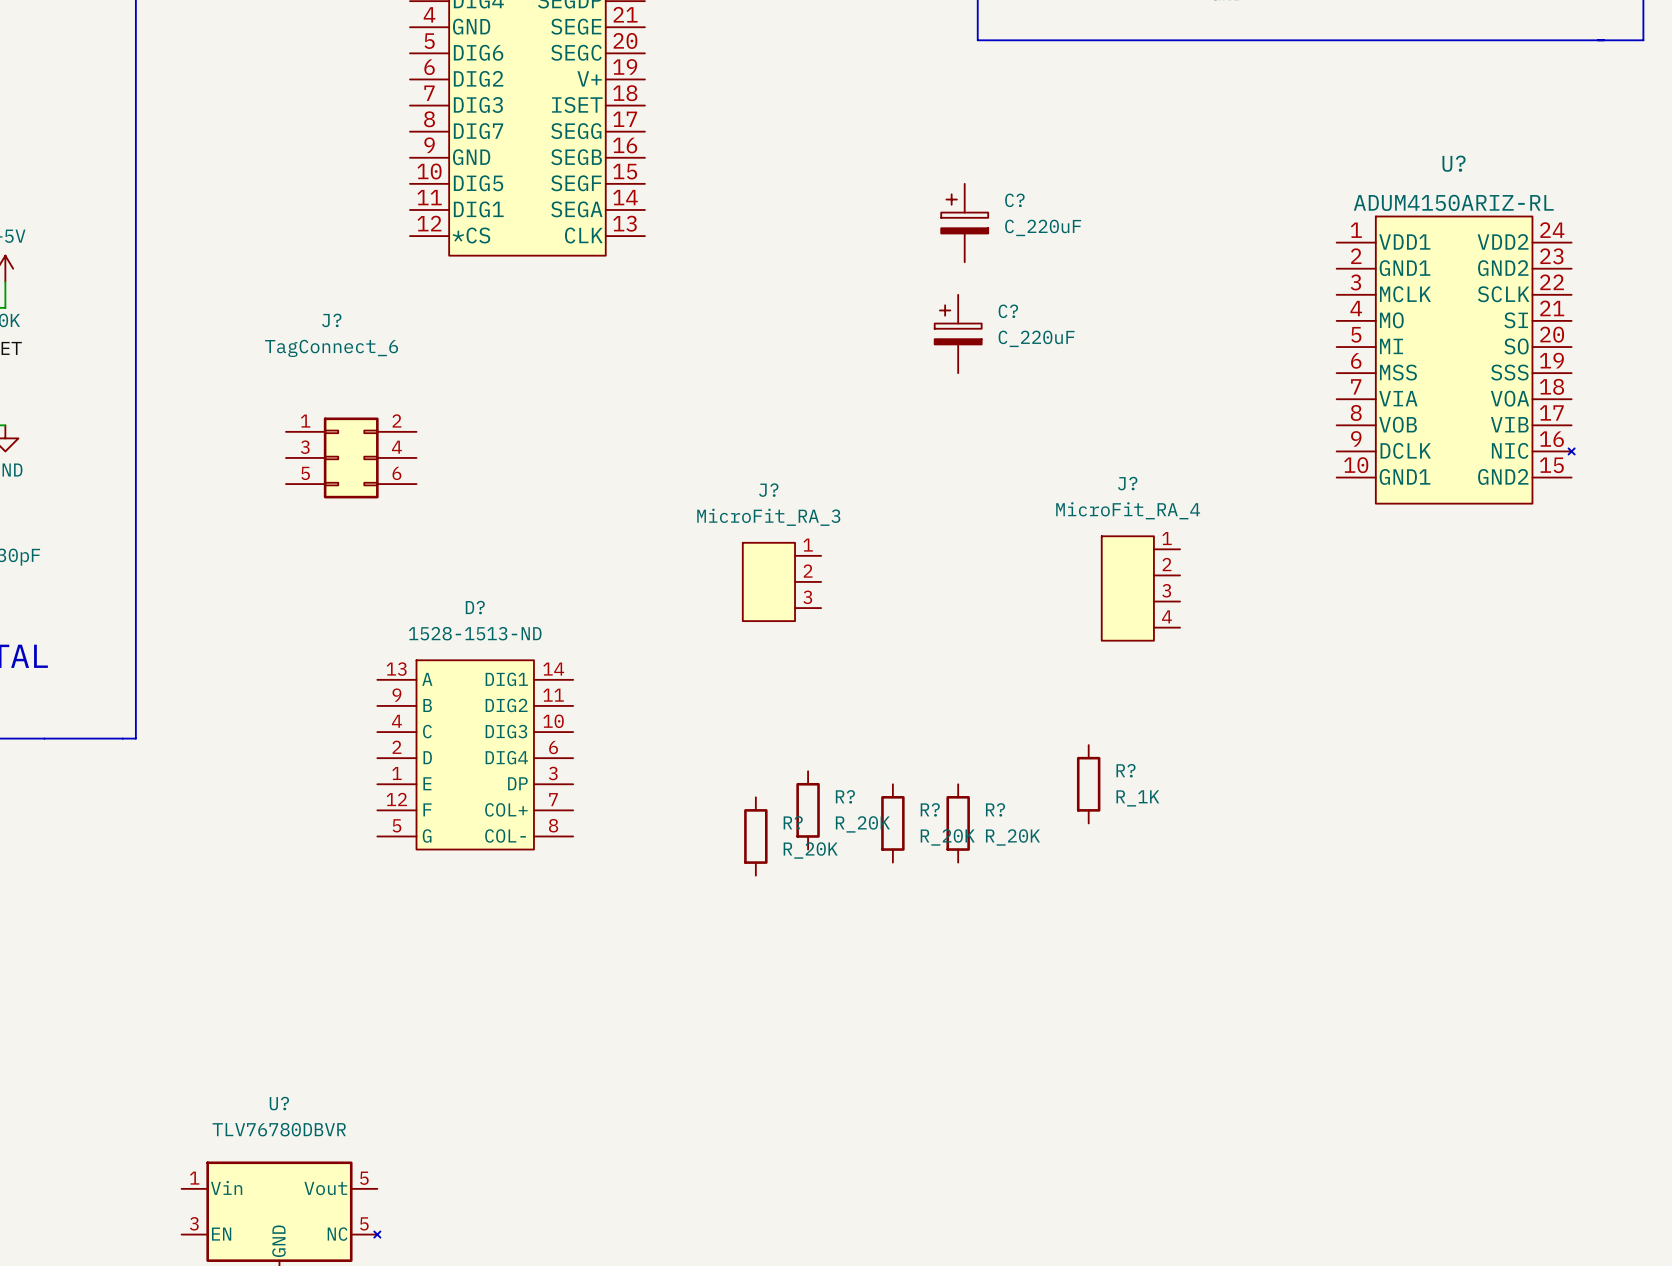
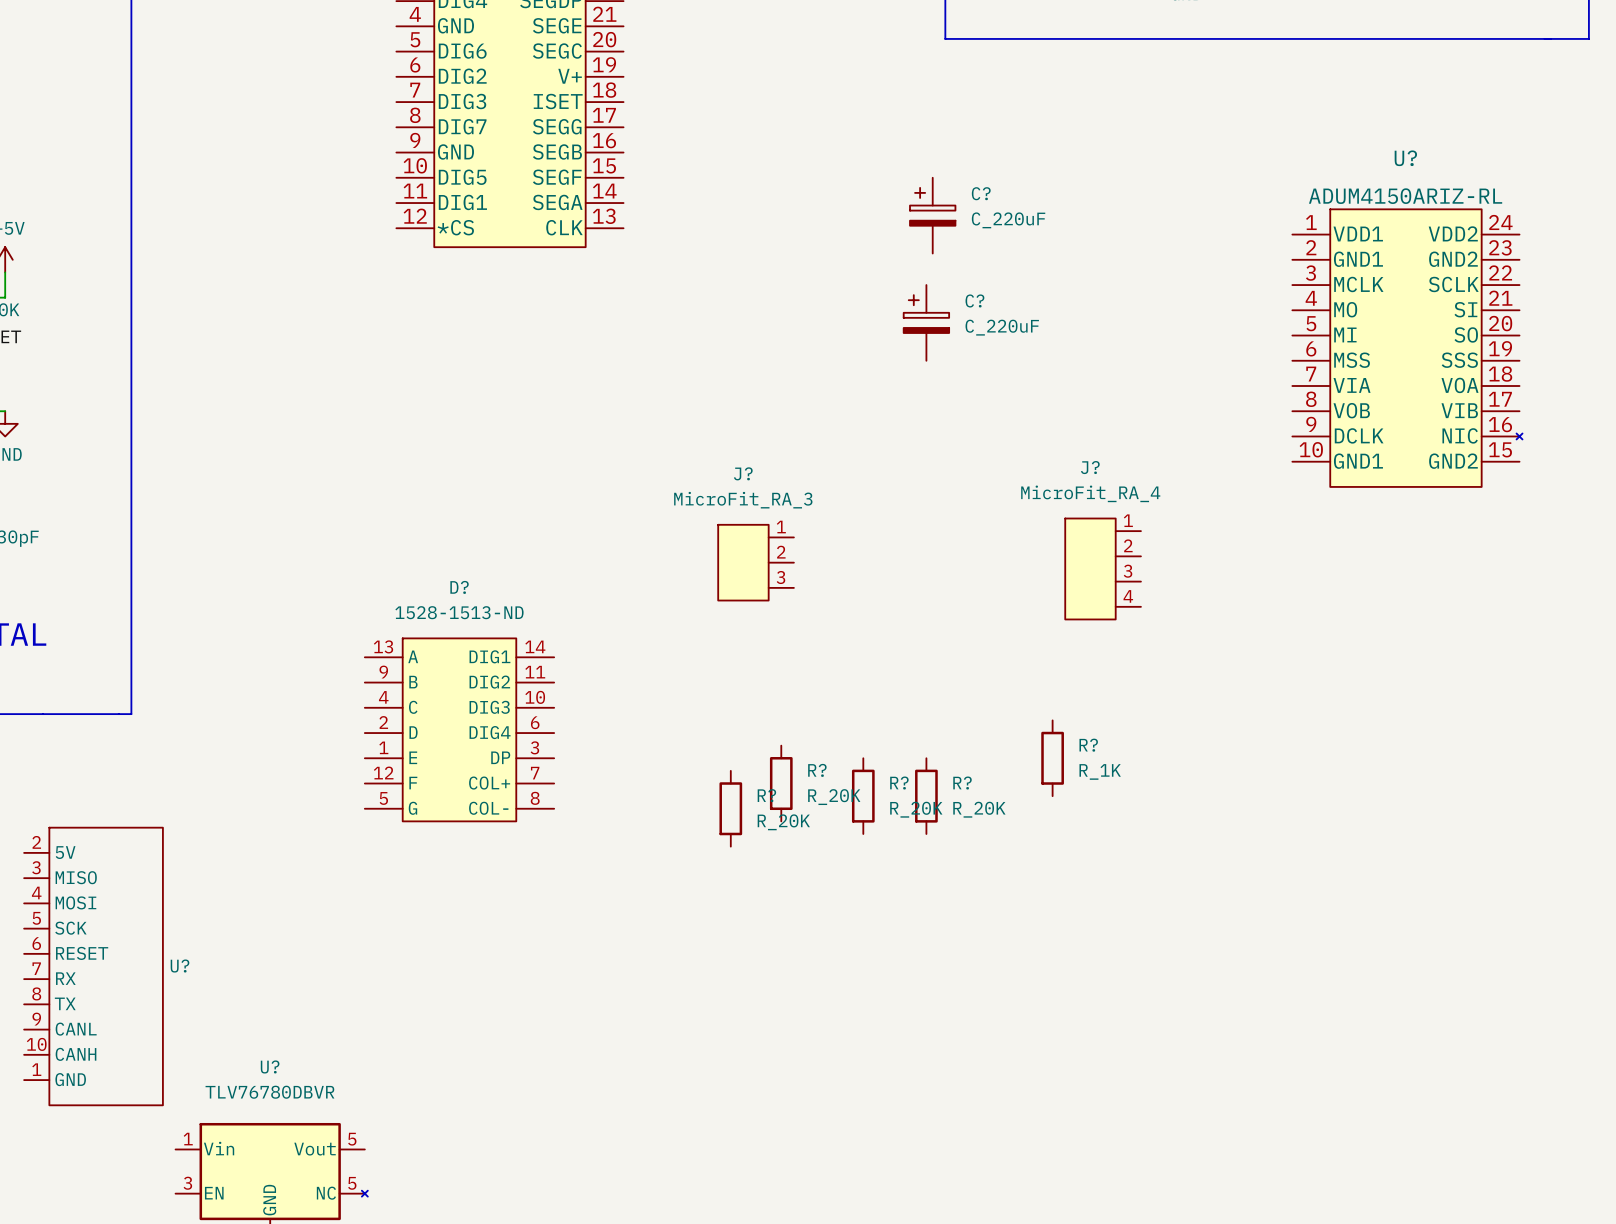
J?: TagConnect_6 (351, 457) -> none
U?: none -> (93, 966)

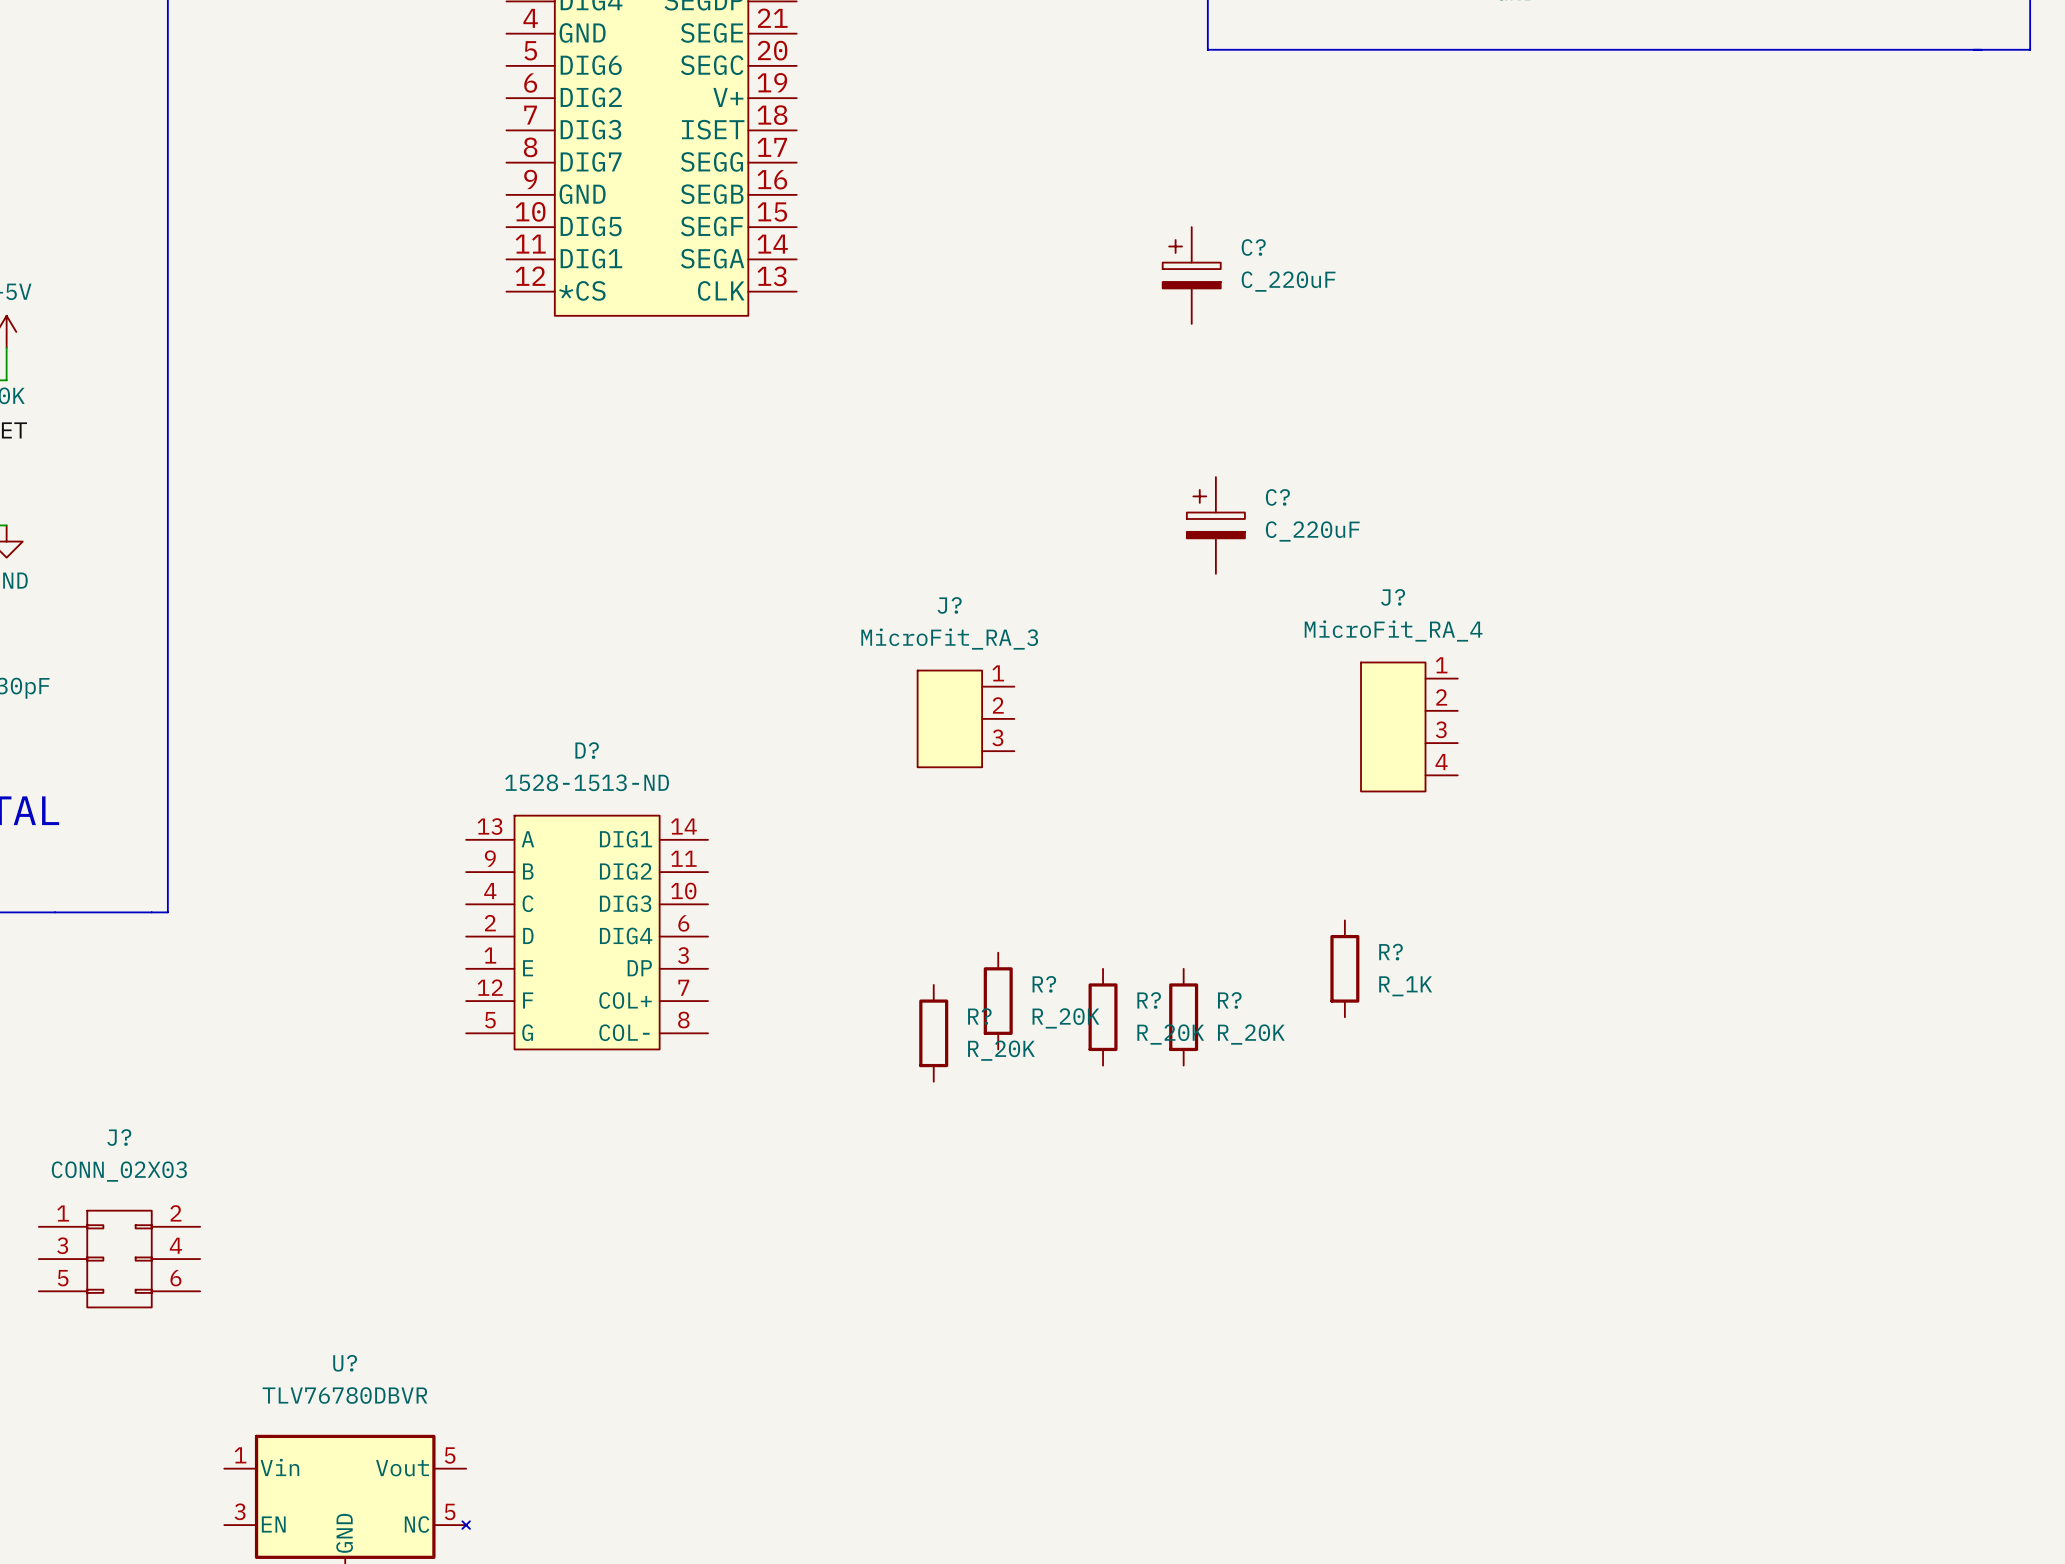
C? position: (926, 322) -> (1215, 525)
U?: ADUM4150ARIZ-RL (1407, 348) -> none
U?: (93, 966) -> none
J?: none -> CONN_02X03 (119, 1259)

